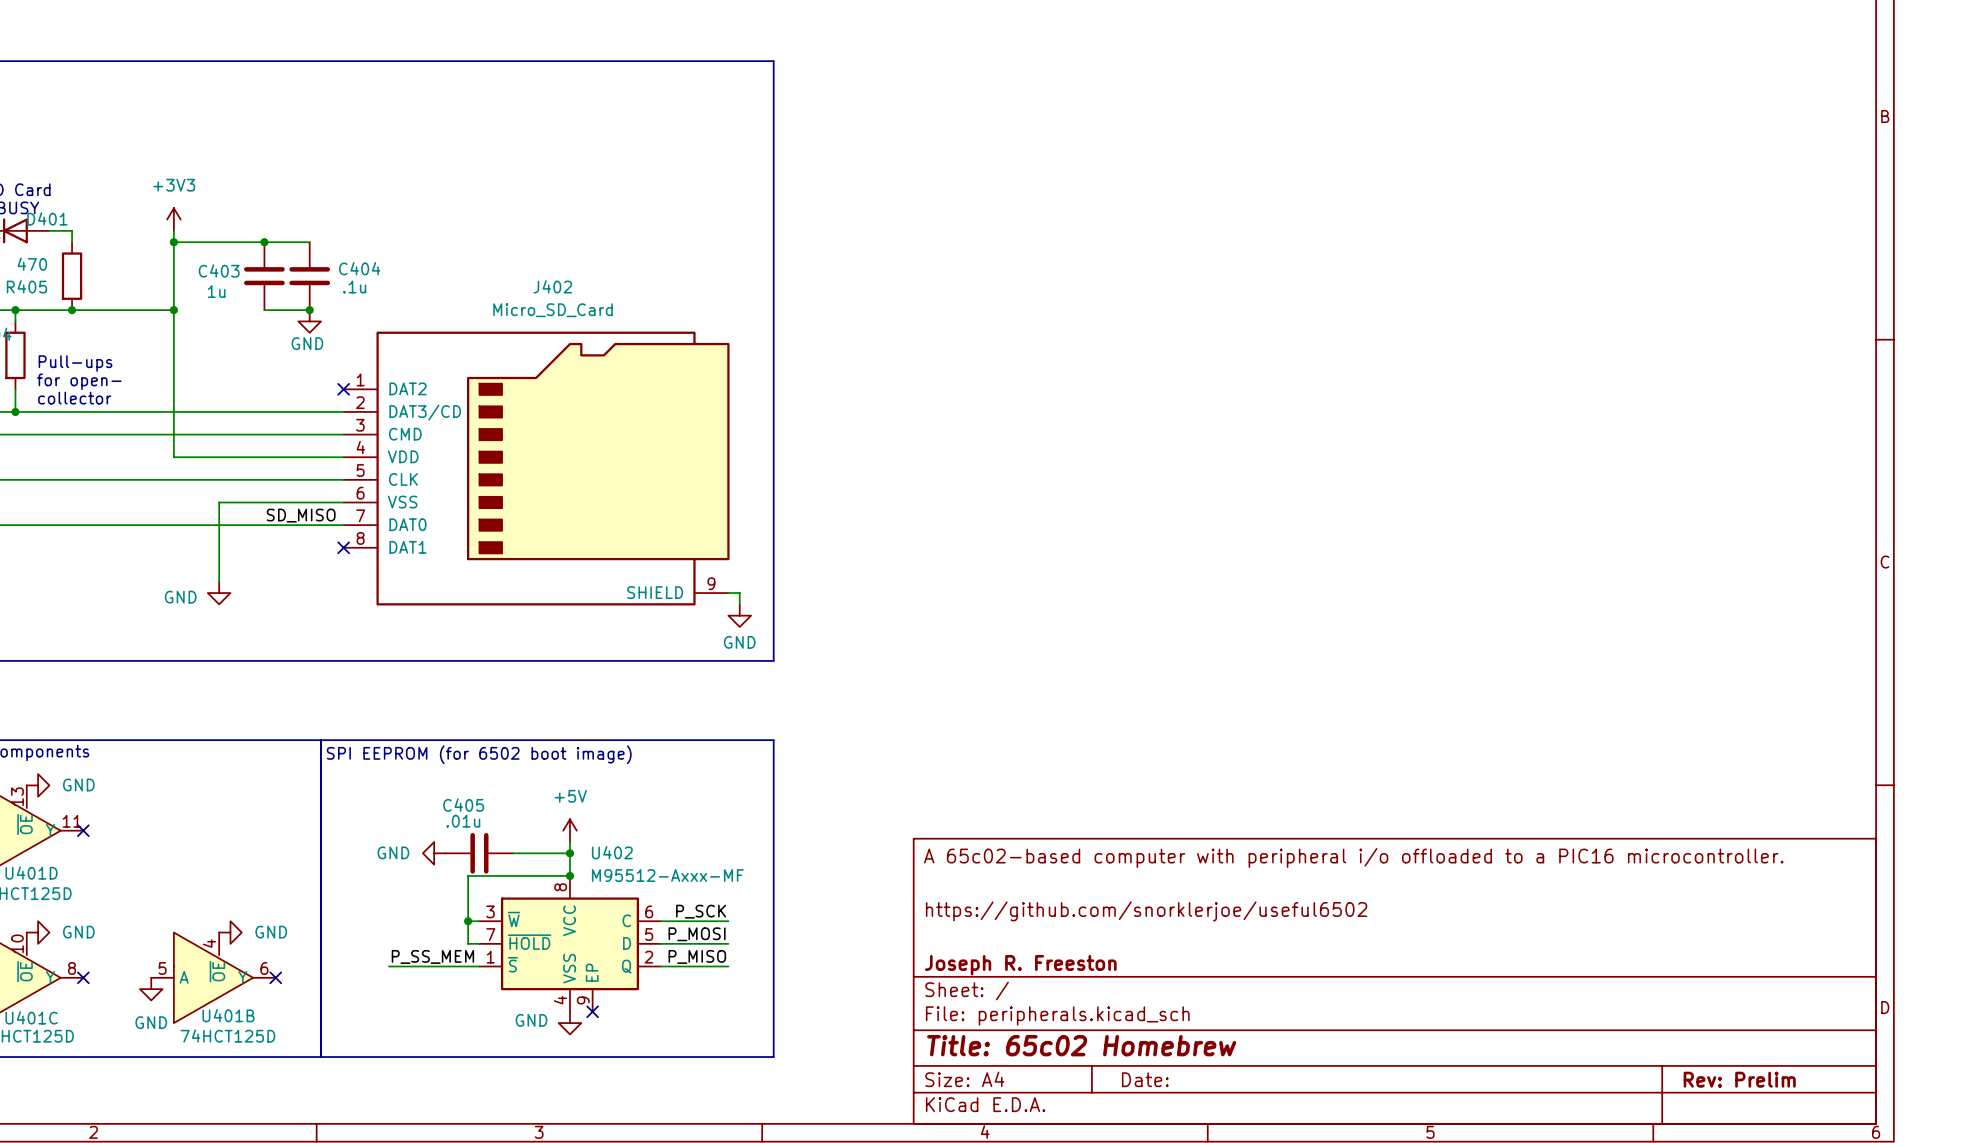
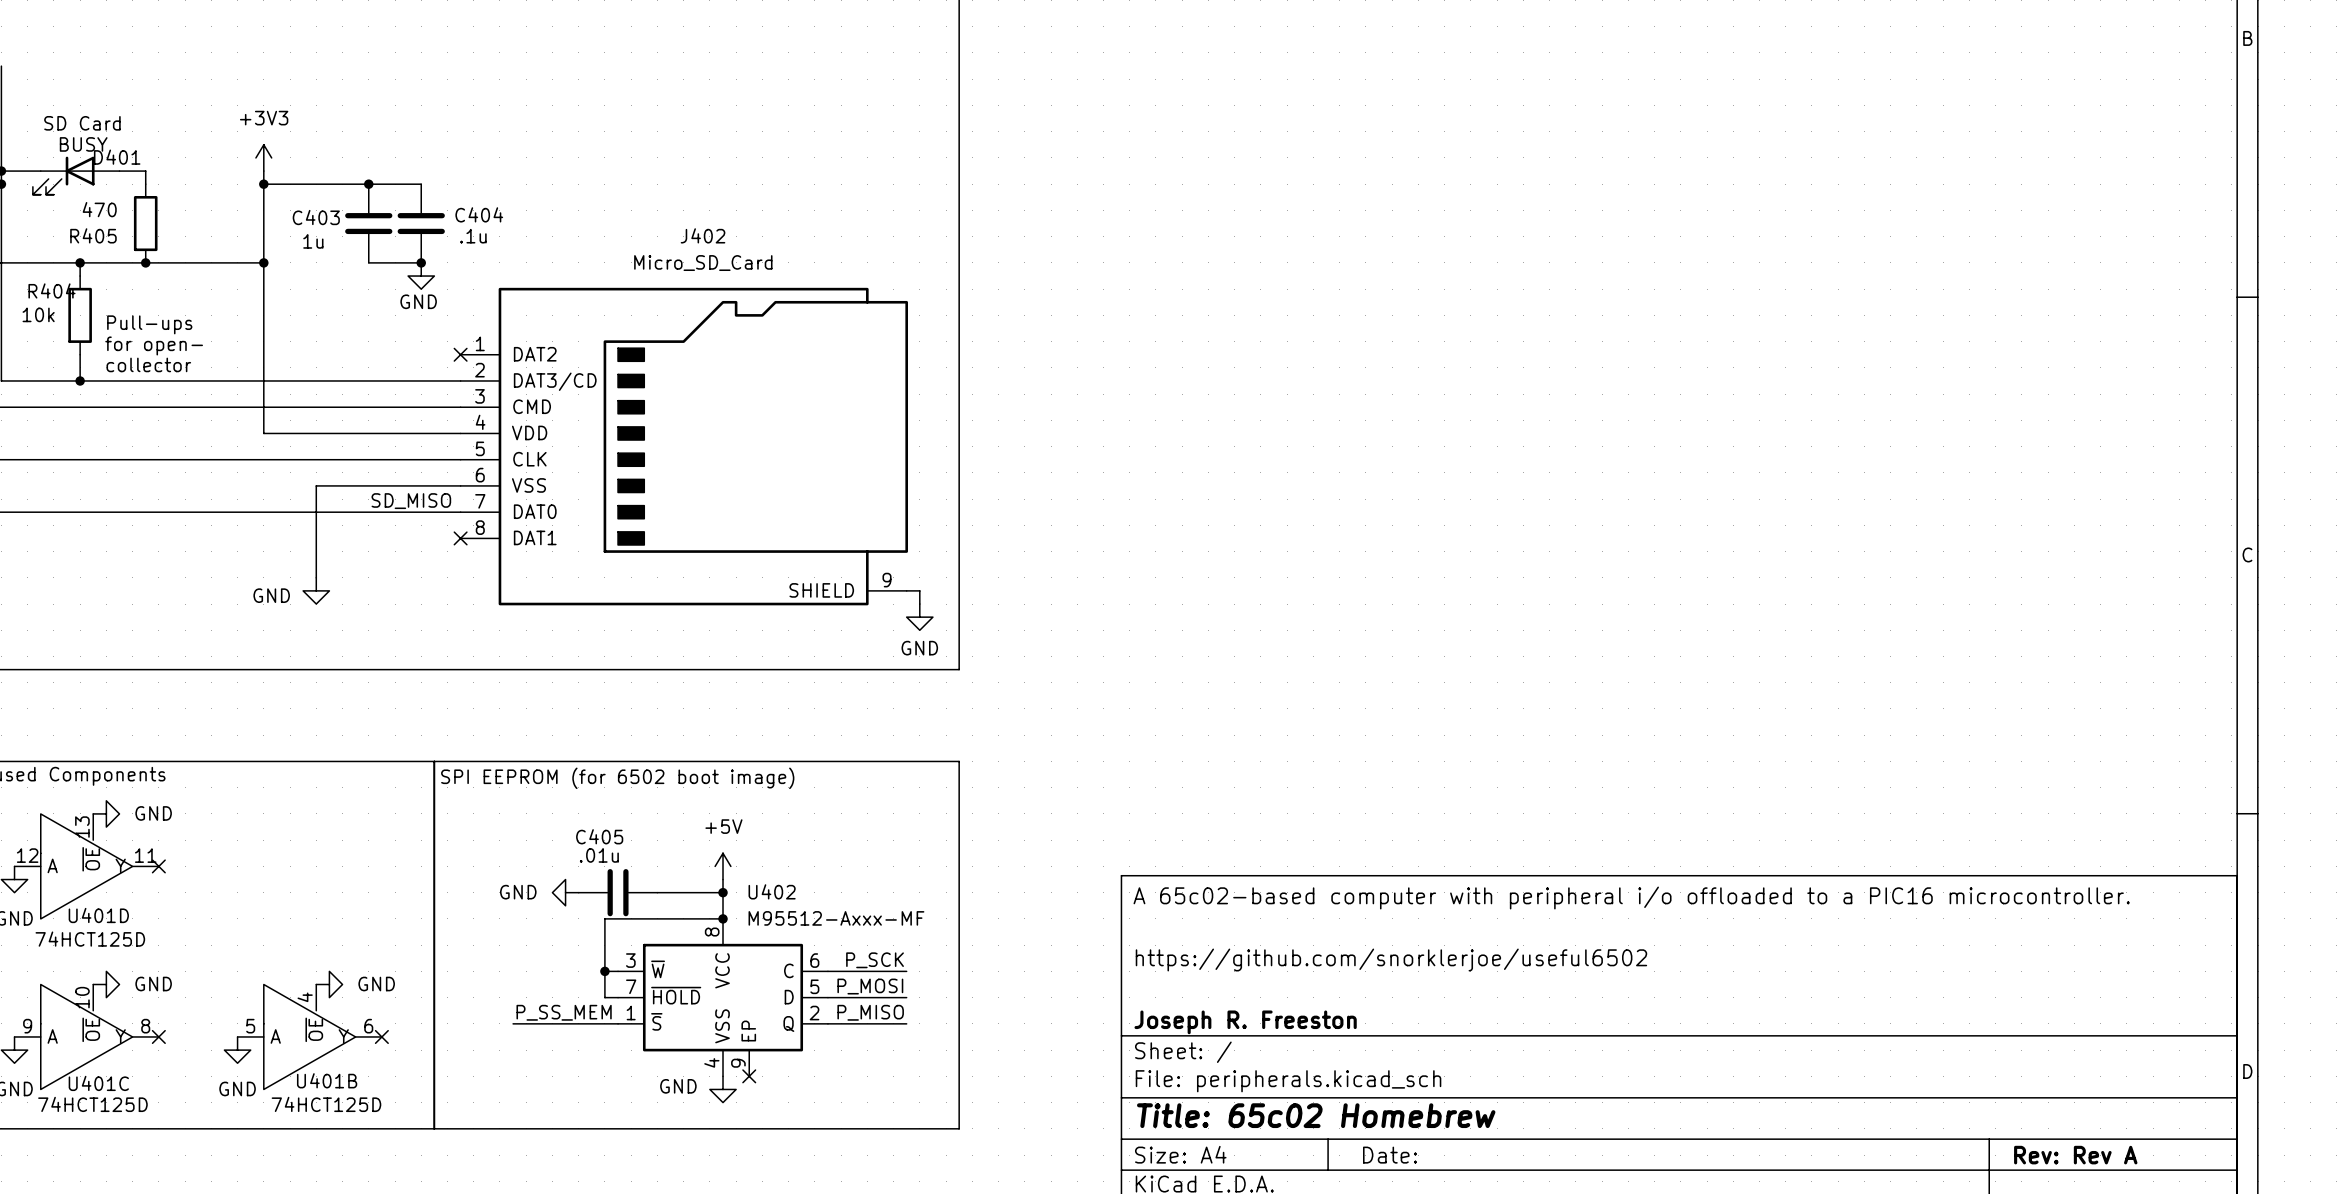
title block: Rev: Prelim (1739, 1079) -> Rev: Rev A (2075, 1155)

